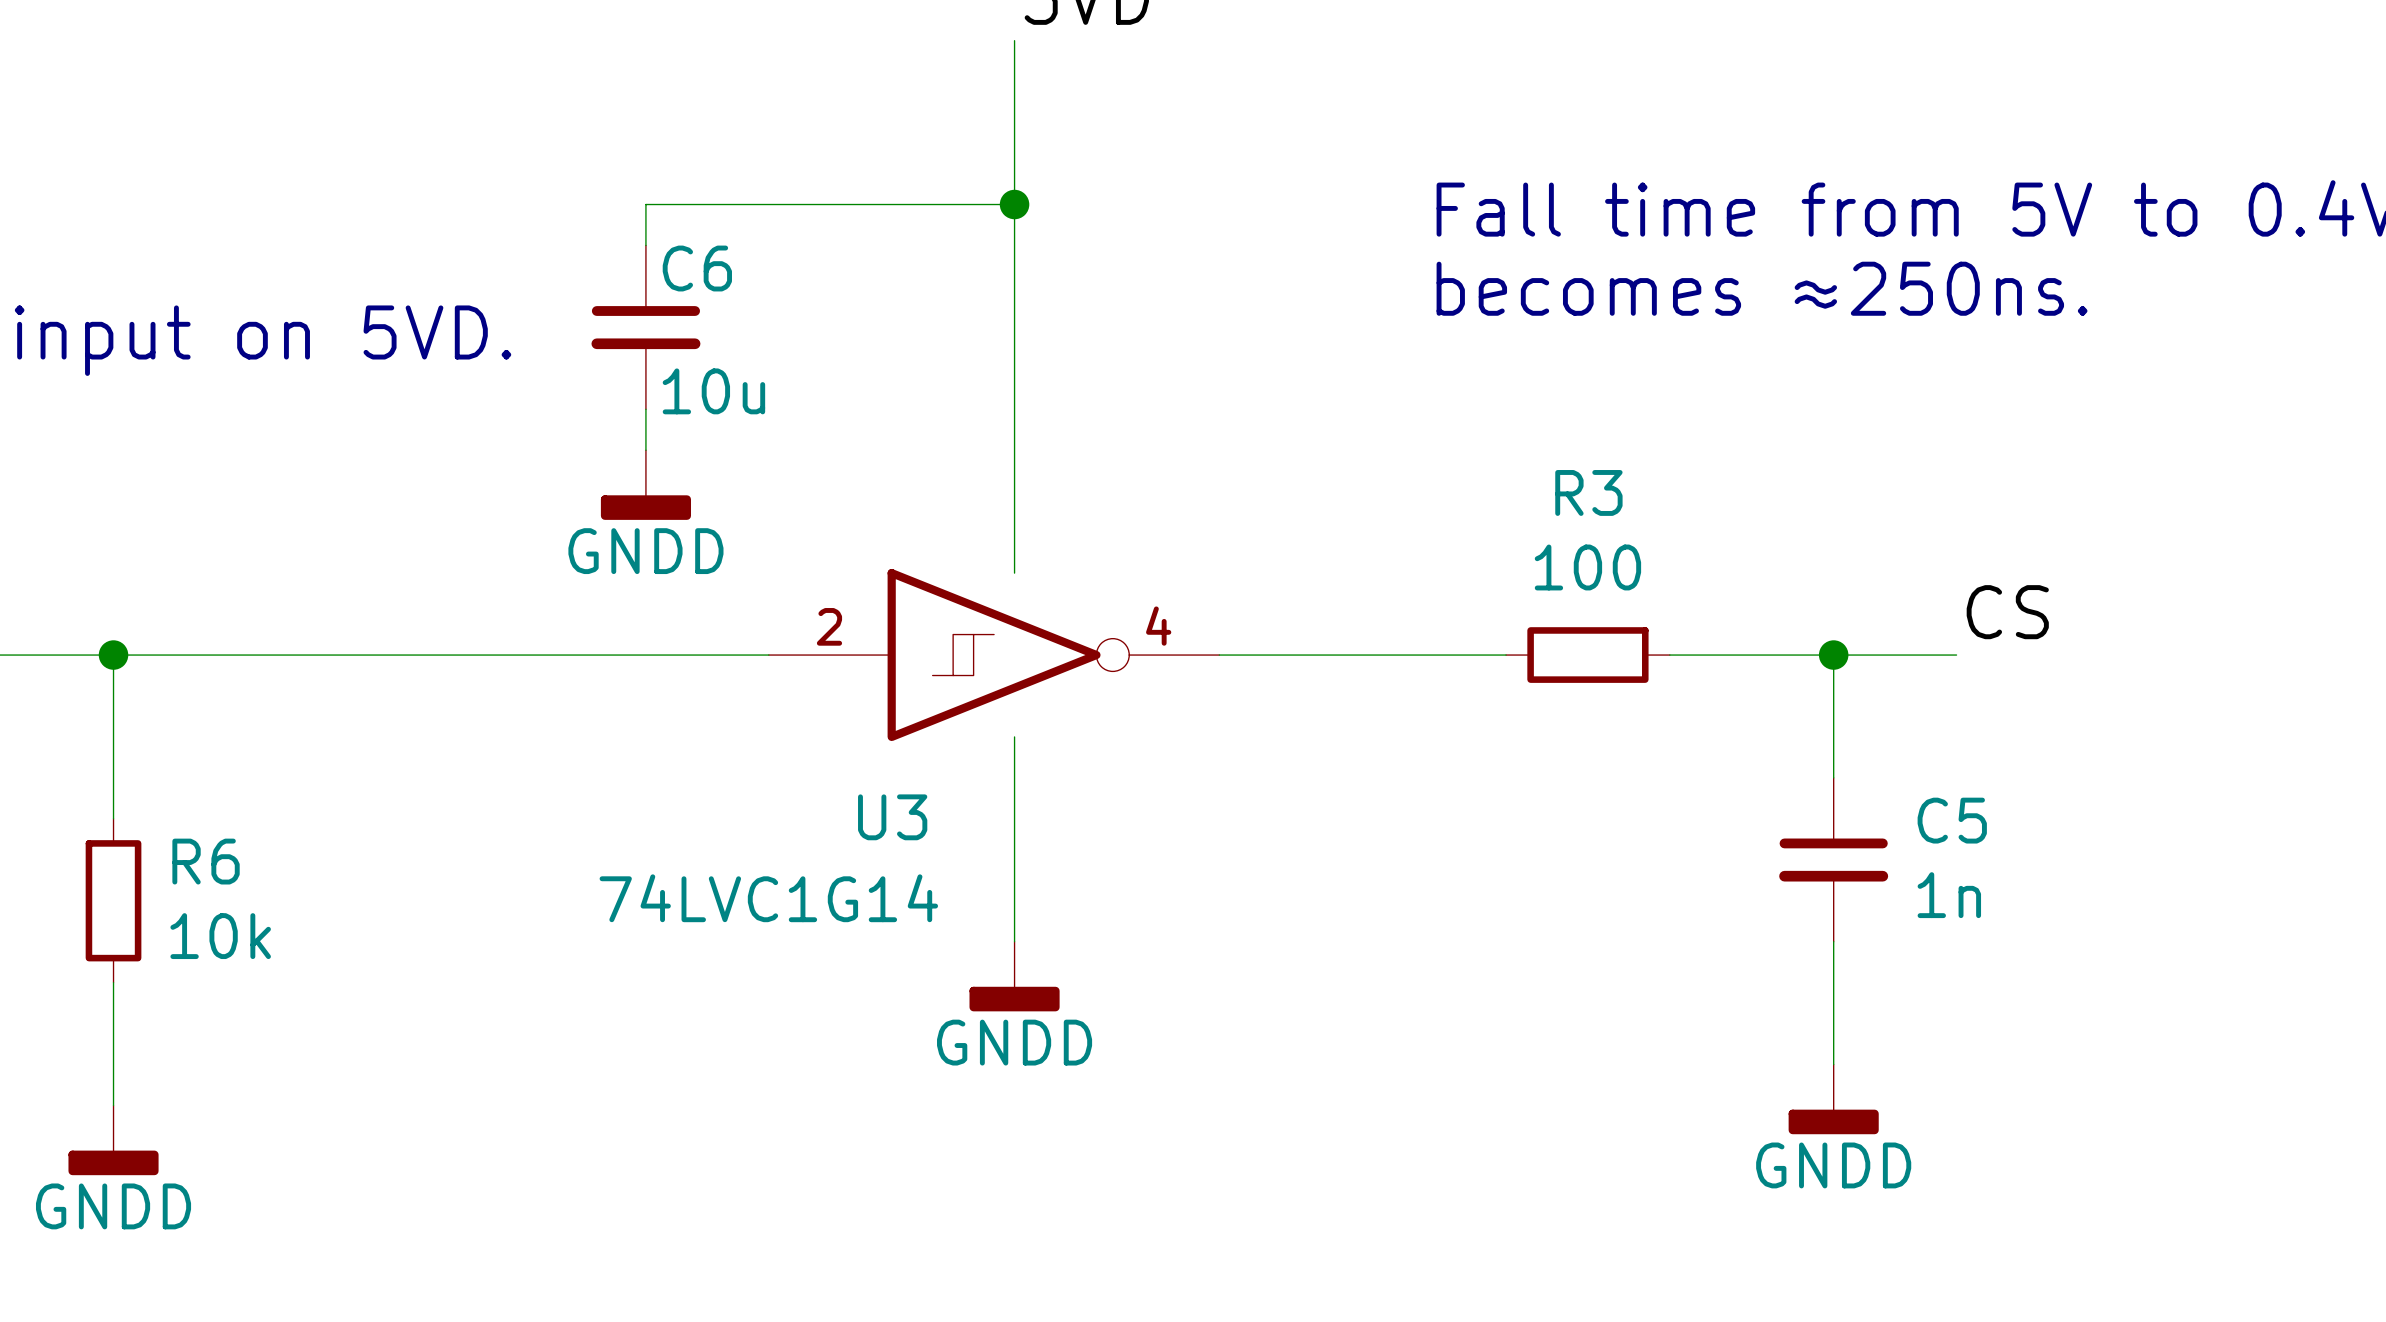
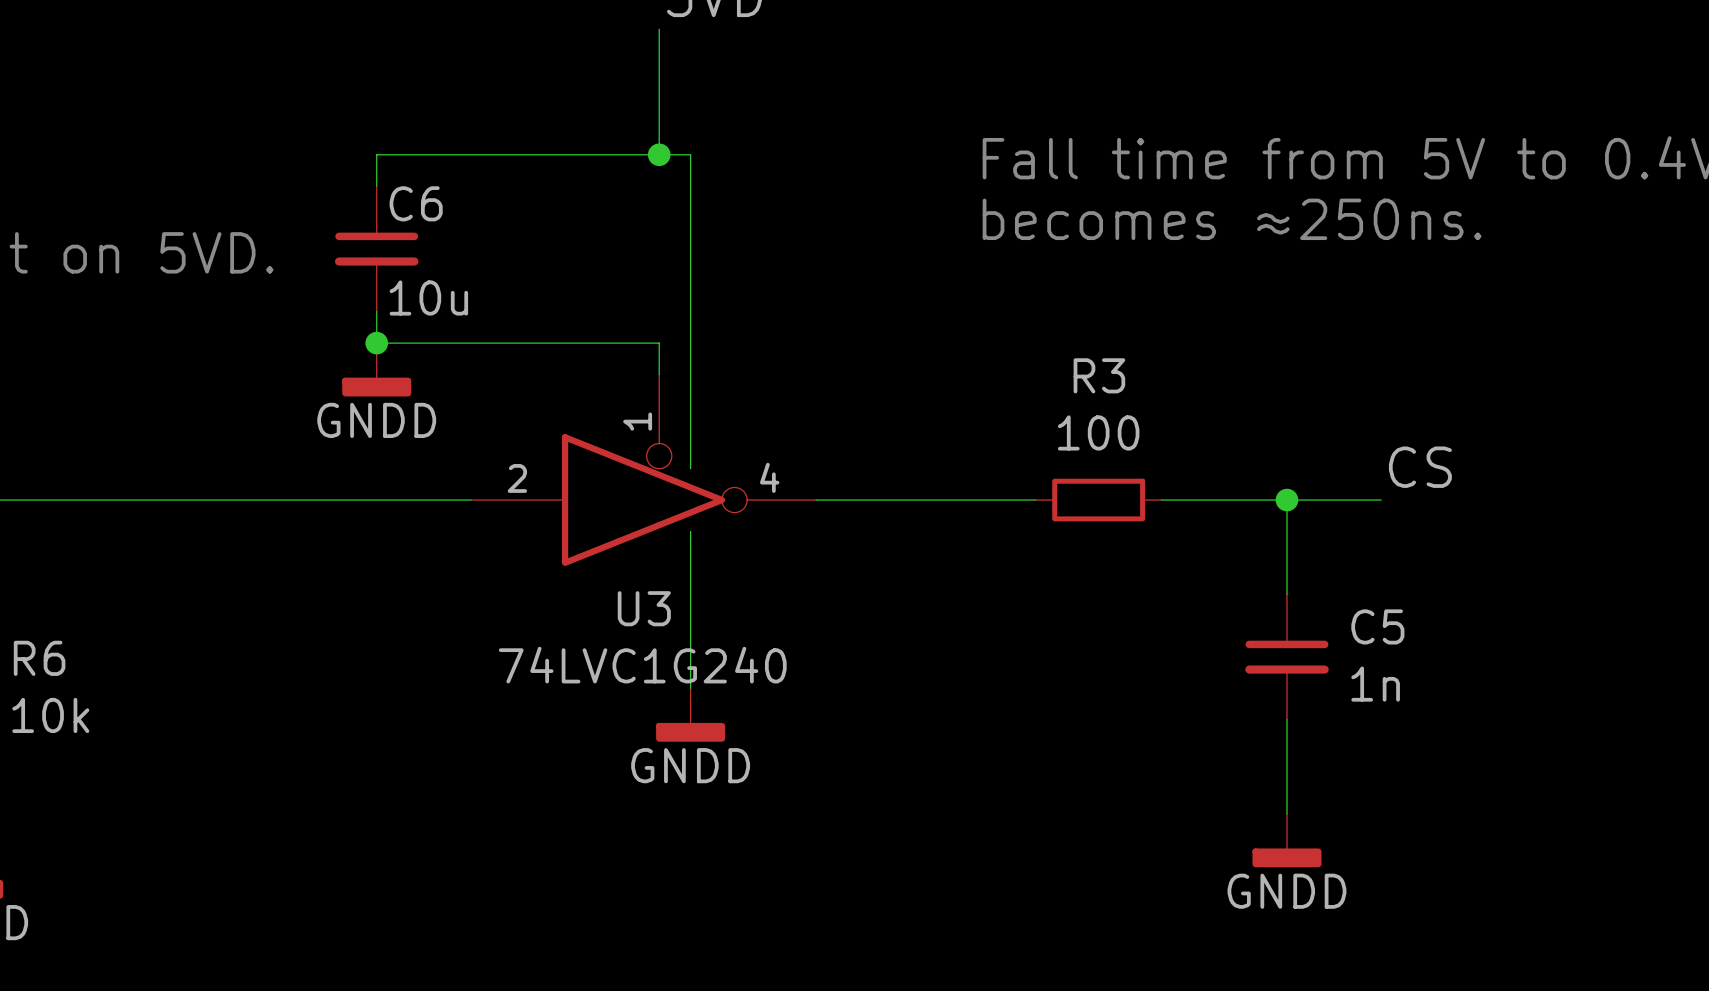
wire: (1014, 204) (1014, 450) -> (659, 154) (690, 154) (690, 468)
wire: none -> (376, 343) (659, 343)
junction: none -> (376, 343)
U3 symbol: [768, 569, 1220, 742] -> [470, 374, 817, 566]
wire: (1014, 736) (1014, 941) -> (690, 531) (690, 688)
U3 name position: U3 (892, 817) -> U3 (644, 608)
U3 value: 74LVC1G14 (768, 898) -> 74LVC1G240 (642, 665)
power symbol position: GNDD (1014, 976) -> GNDD (690, 715)

